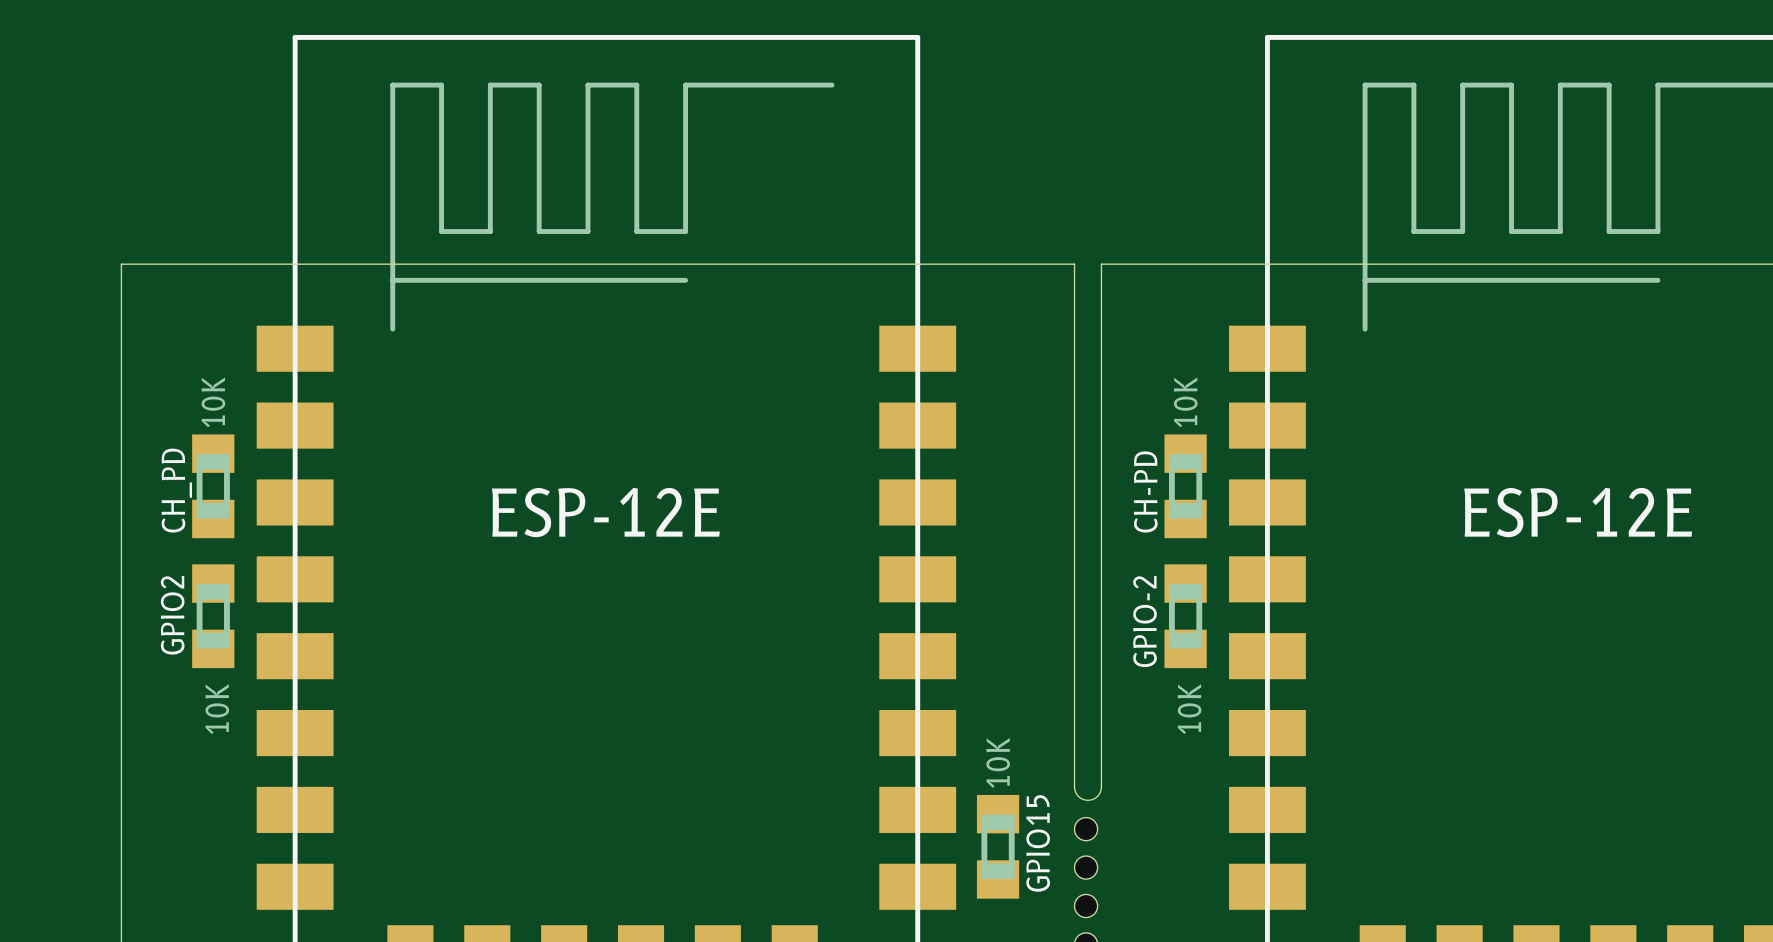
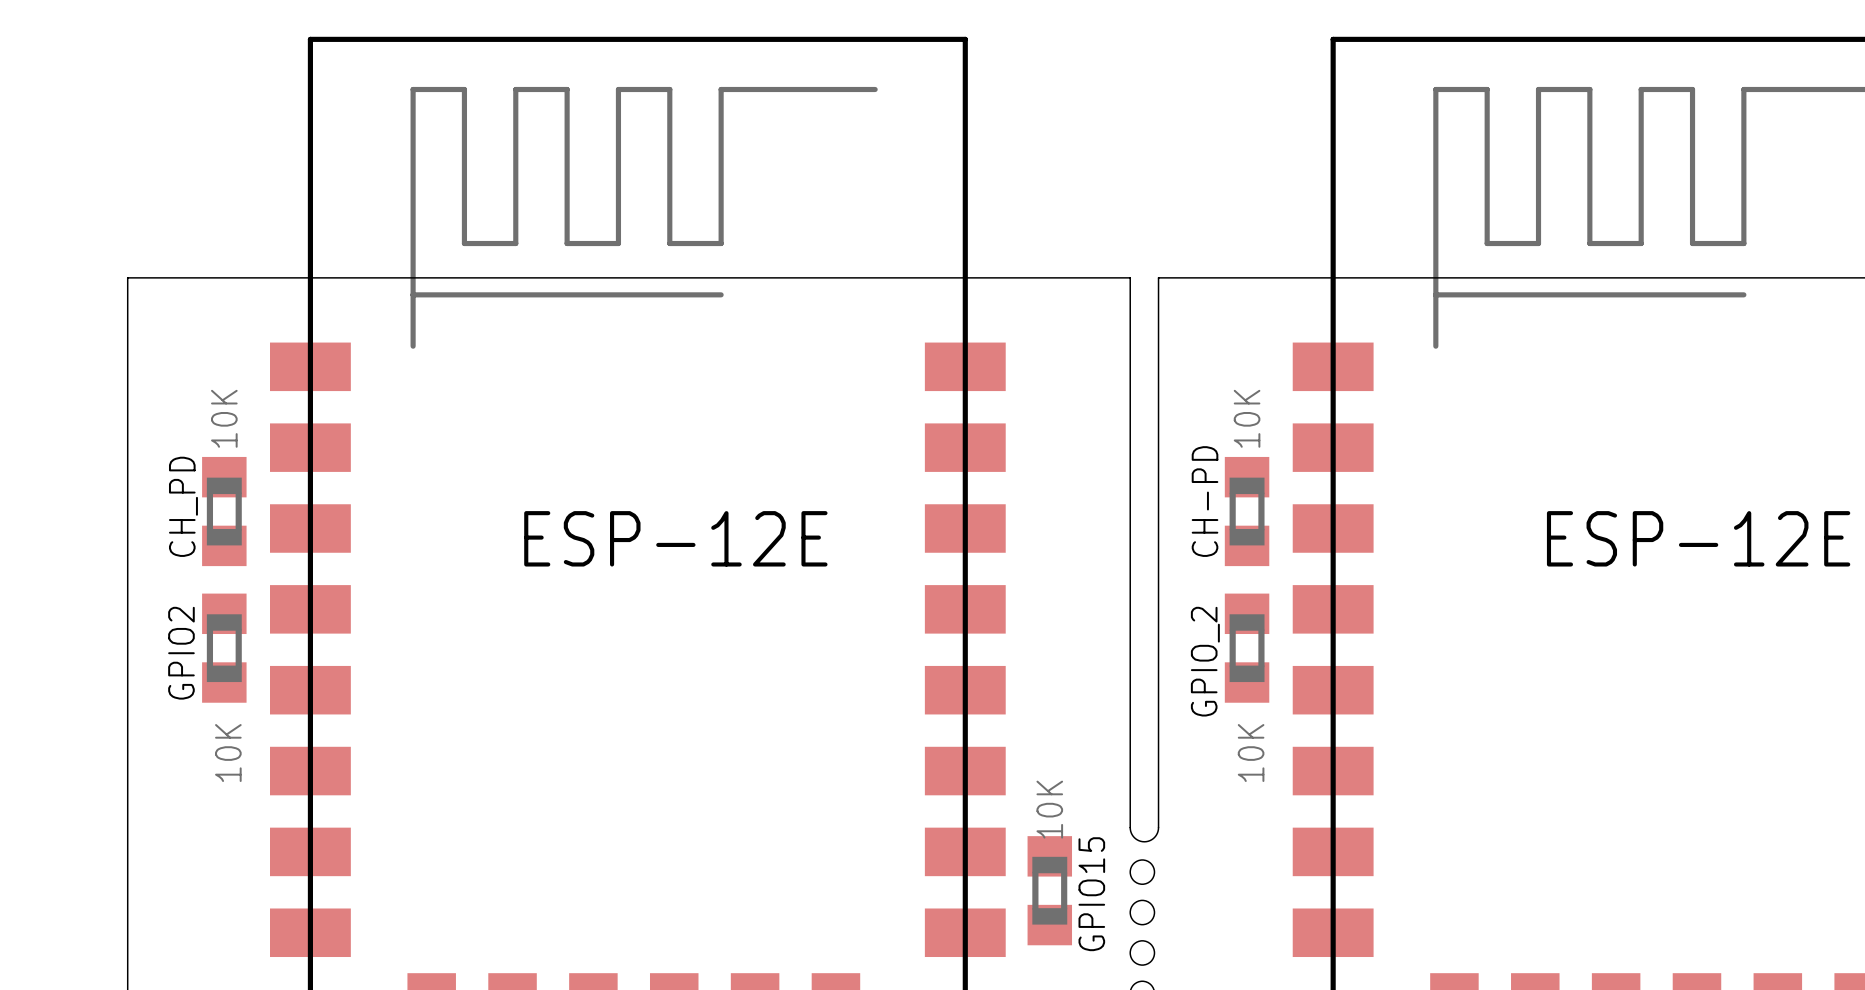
GPIO-2 name: GPIO-2 (1144, 621) -> GPIO_2 (1205, 661)

